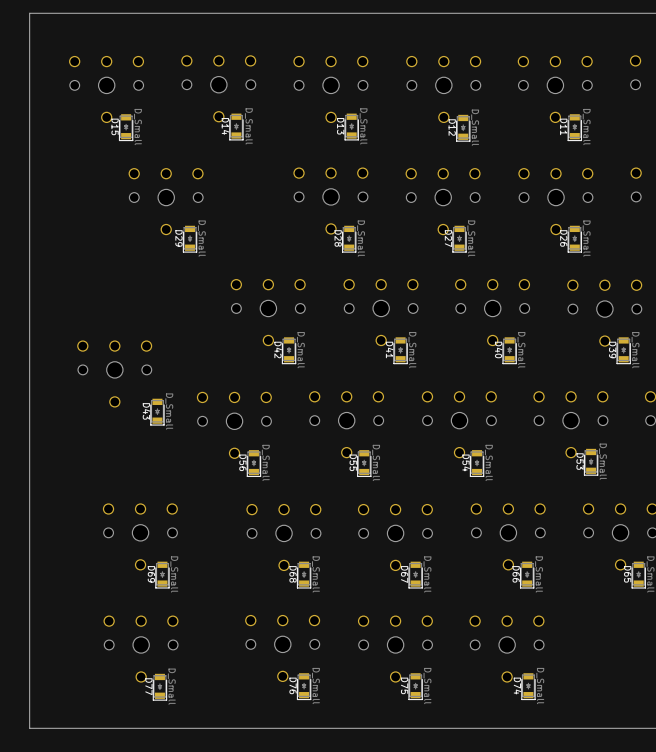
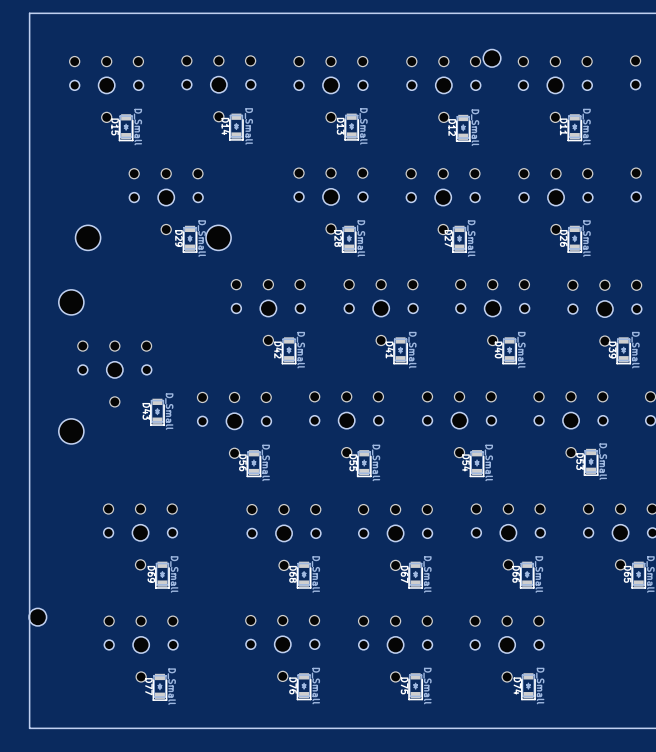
part: none -> (492, 58)
part: none -> (88, 237)
part: none -> (218, 237)
part: none -> (71, 302)
part: none -> (71, 431)
part: none -> (37, 617)

